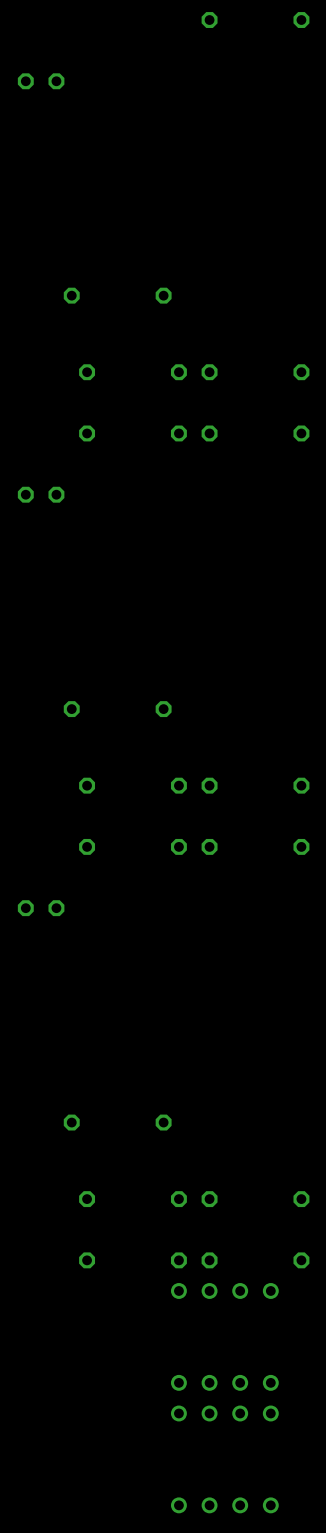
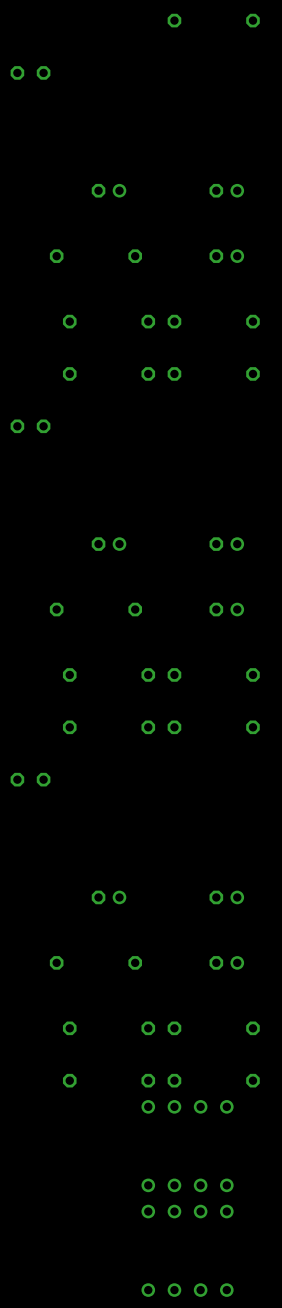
part: none -> (109, 190)
part: none -> (226, 190)
part: none -> (226, 256)
part: none -> (109, 544)
part: none -> (226, 544)
part: none -> (226, 609)
part: none -> (109, 897)
part: none -> (226, 897)
part: none -> (226, 962)

